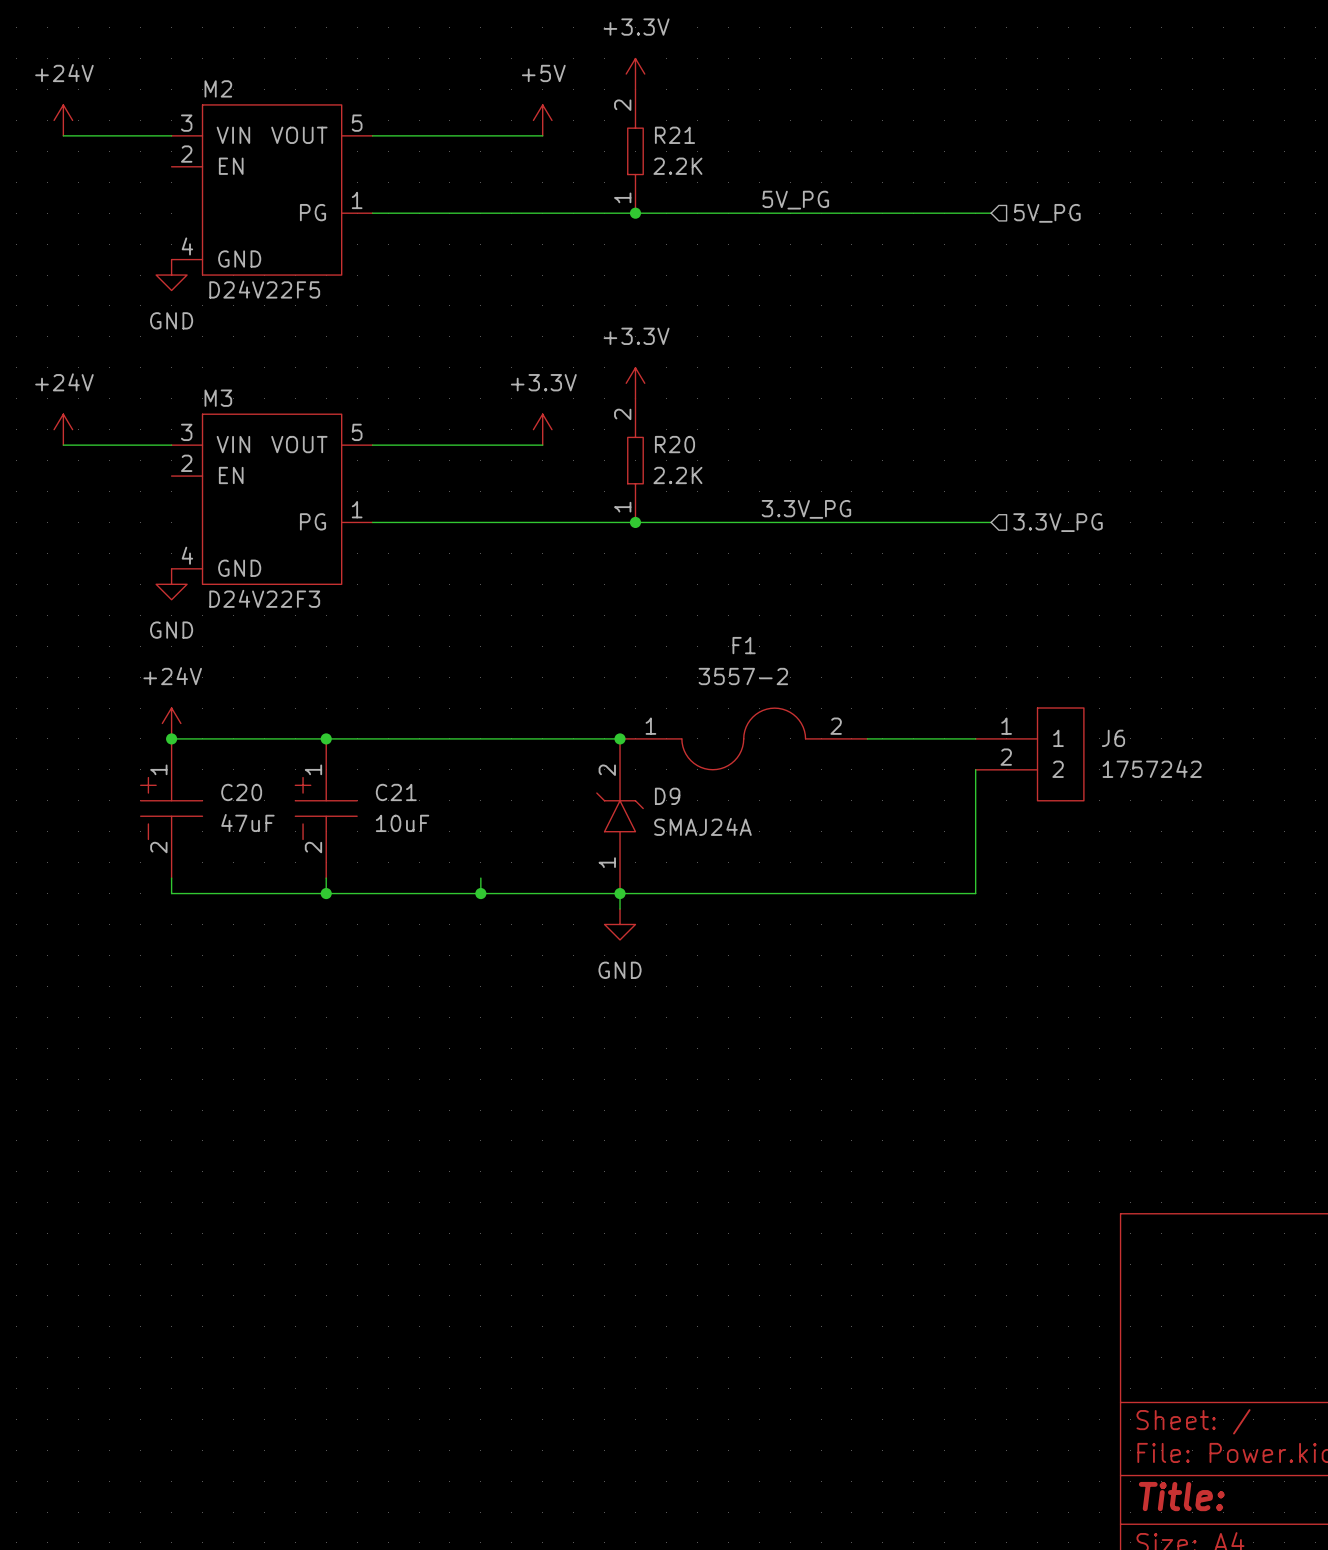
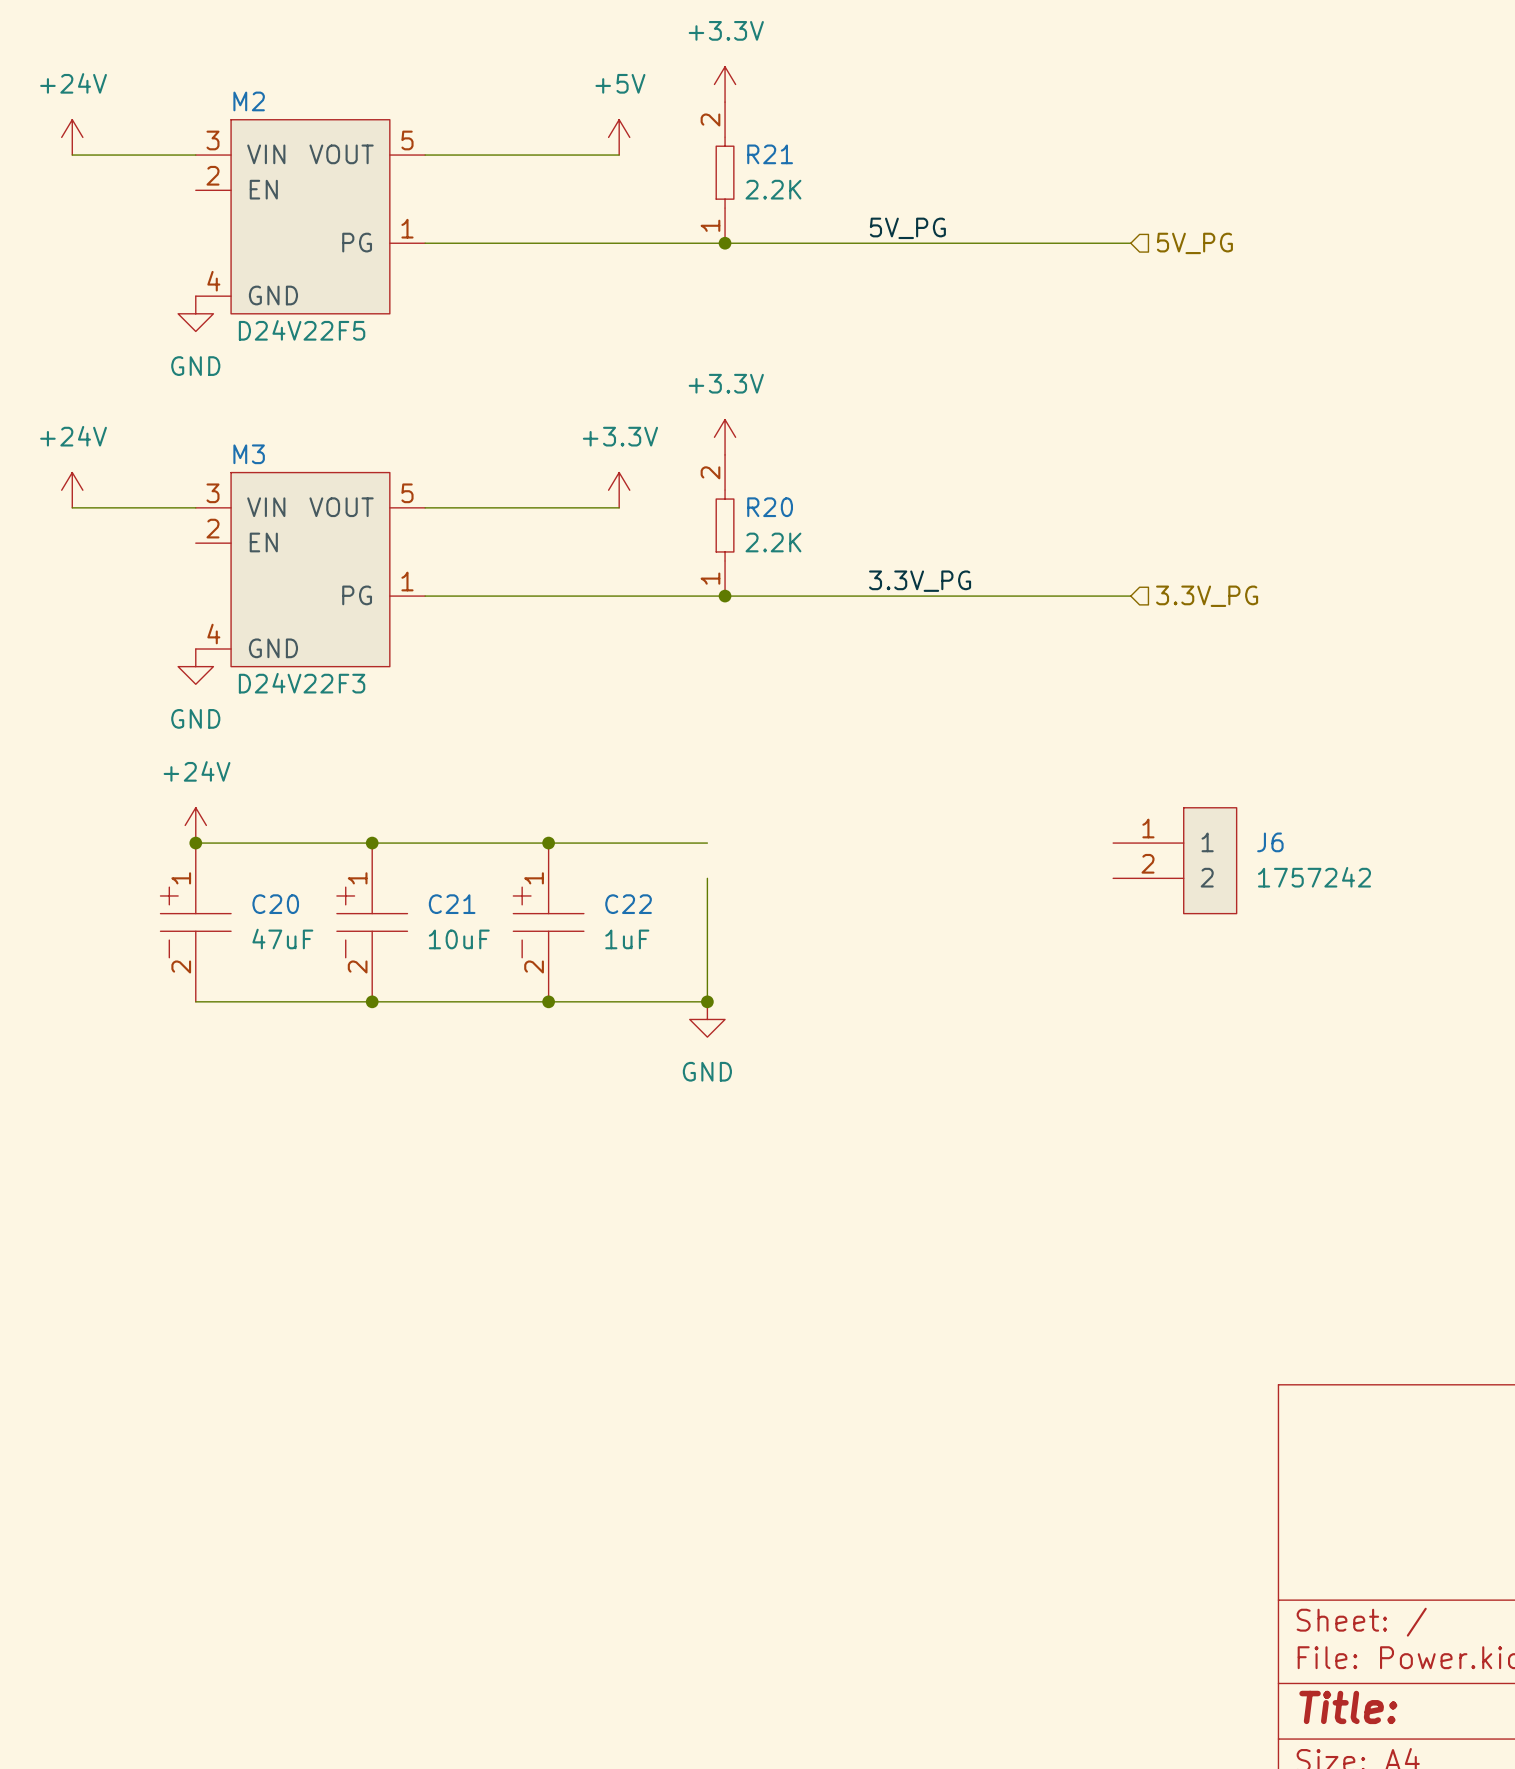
junction: none -> (548, 843)
junction: (620, 738) -> none
F1: (743, 738) -> none
wire: (867, 738) (975, 738) -> none
wire: (975, 769) (975, 893) (171, 893) (171, 878) -> (707, 878) (707, 1001) (195, 1001)
C22: none -> (548, 922)
D9: (620, 816) -> none
wire: (326, 878) (326, 893) -> none
wire: (480, 878) (480, 893) -> none
junction position: (326, 893) -> (372, 1001)
junction position: (480, 893) -> (548, 1001)
wire: (620, 893) (620, 909) -> none
junction position: (620, 893) -> (707, 1001)
power symbol position: GND (620, 924) -> GND (707, 1019)

